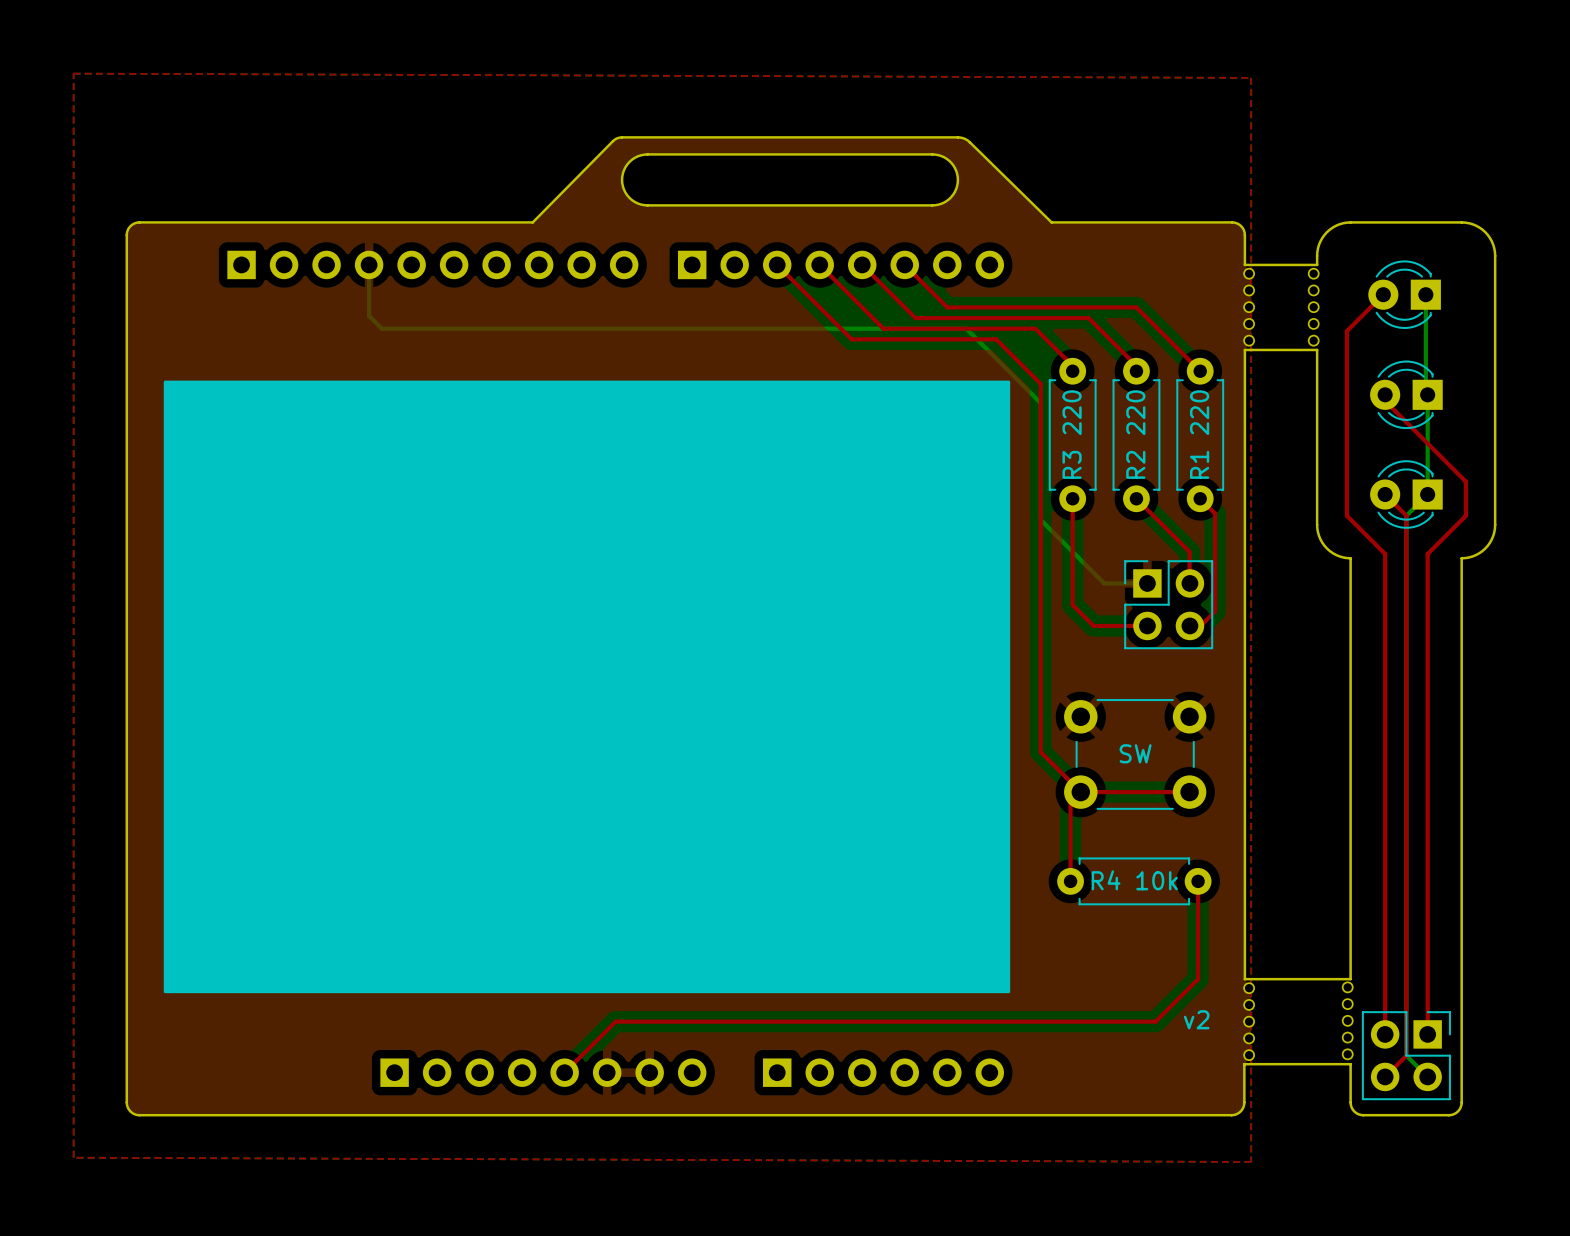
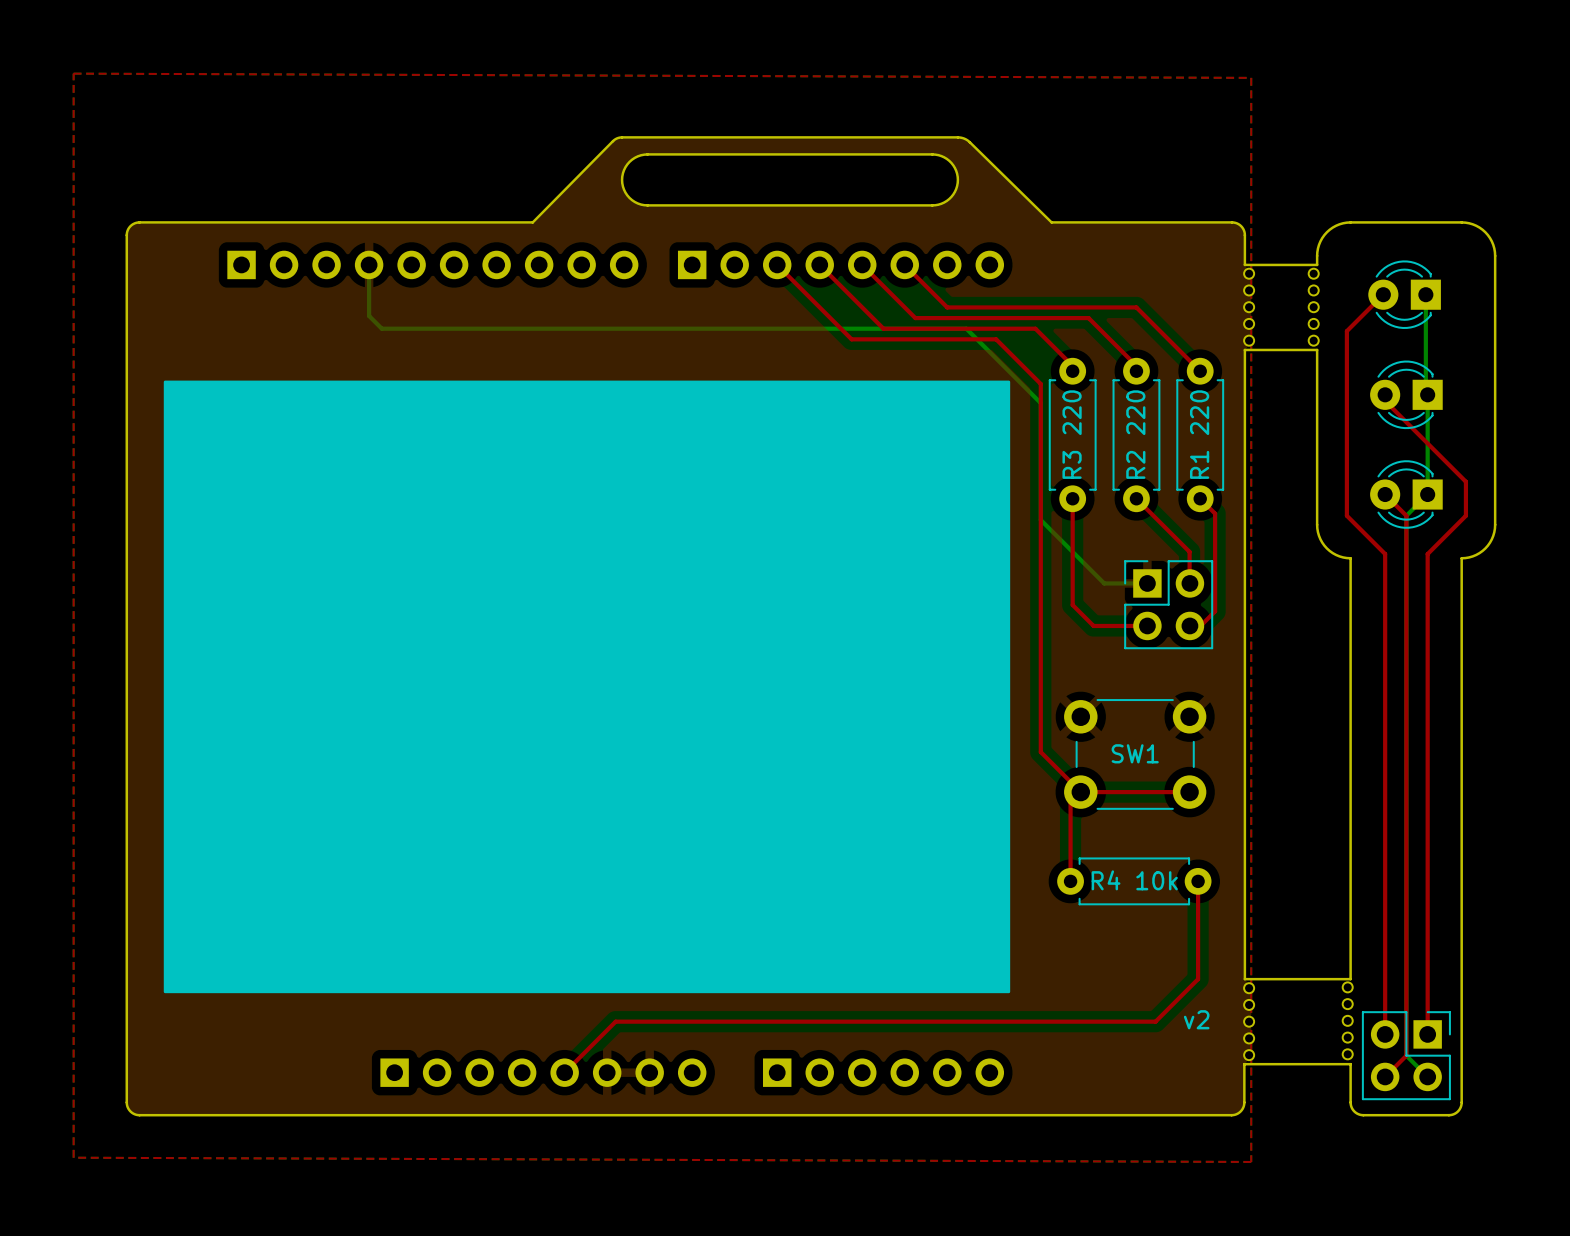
SW1 text: SW (1135, 753) -> none
SW1 name: none -> SW1 (1135, 753)

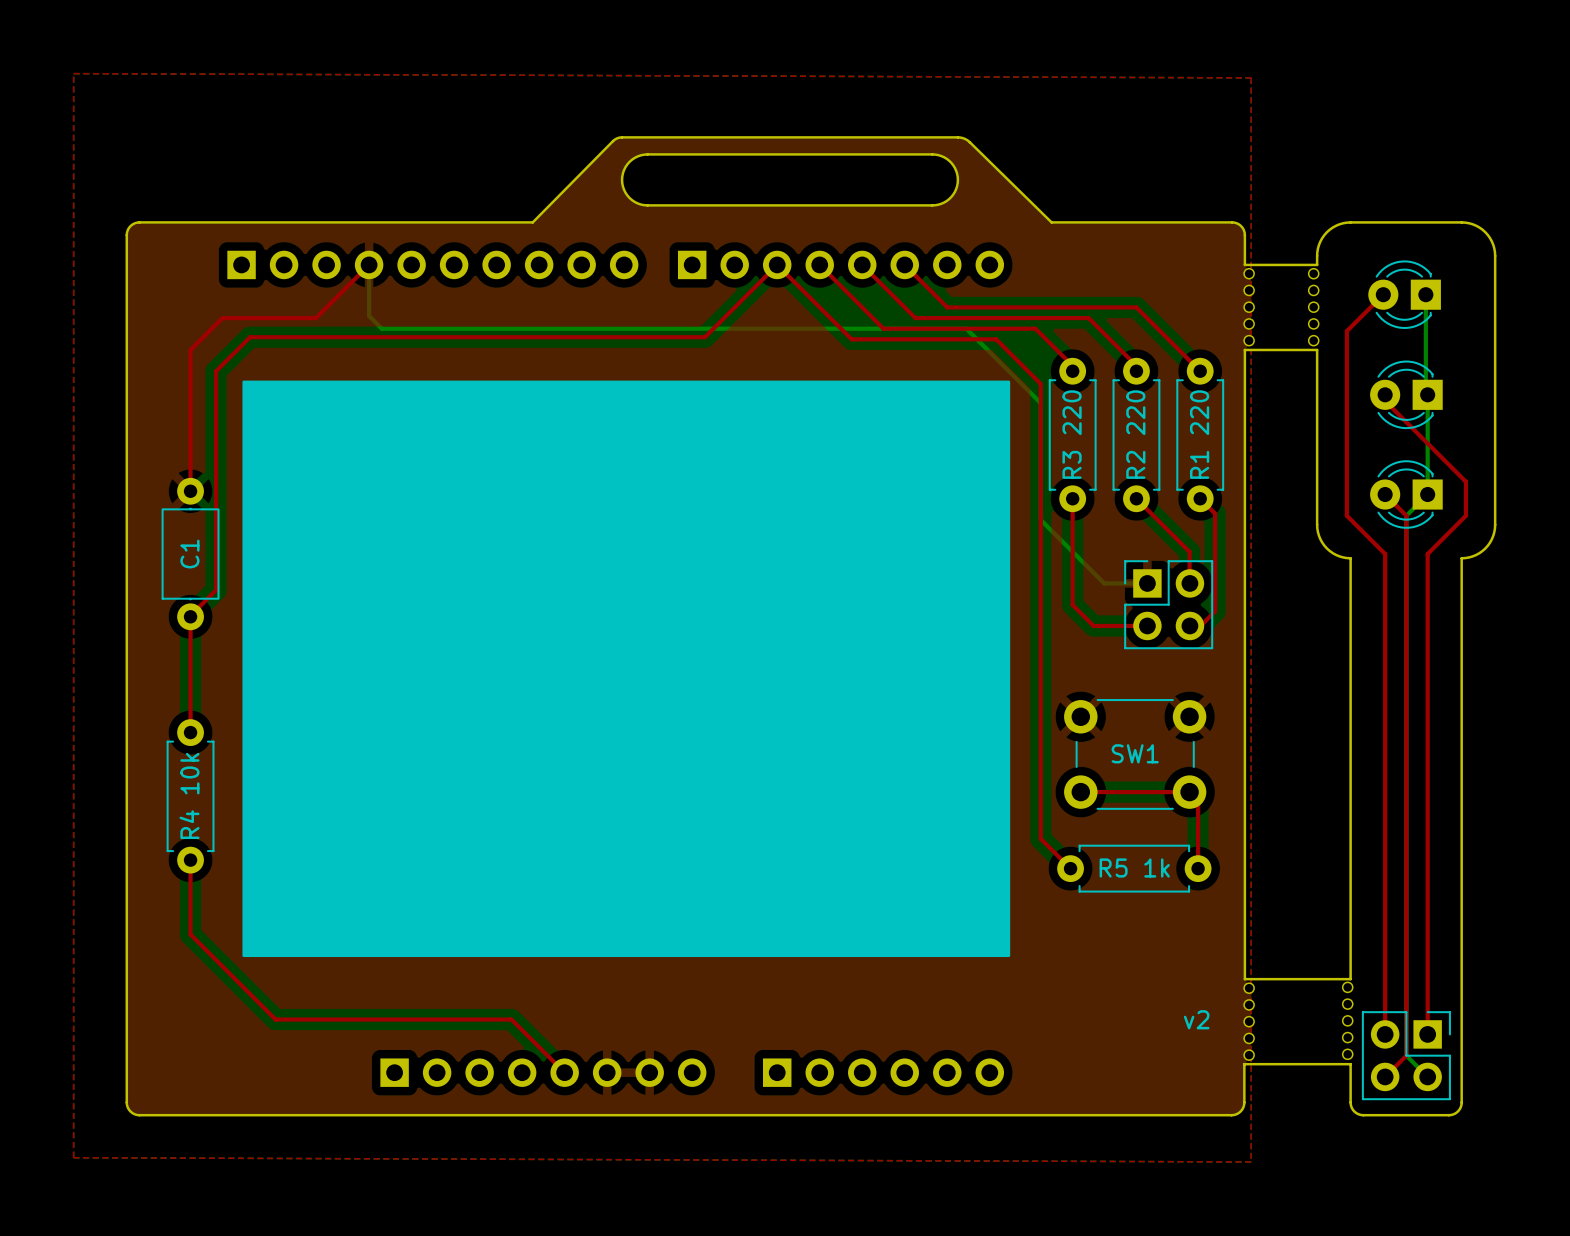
top track: none -> (369, 264) (315, 318) (222, 318) (190, 349) (190, 490)
top track: none -> (777, 264) (704, 337) (250, 337) (216, 371) (216, 590) (190, 615) (190, 732)
drawing: [163, 380, 1011, 994] -> none
drawing: none -> [242, 380, 1011, 958]
part: none -> (190, 554)
top track: (1040, 752) (1080, 792) -> (1040, 752) (1040, 838) (1070, 868)
top track: none -> (1198, 800) (1198, 868)
top track: (1070, 802) (1070, 881) -> none
part: none -> (1134, 868)
R4 10k rotation: 0° (1134, 881) -> 90° clockwise (190, 796)
R4 10k position: (1134, 881) -> (190, 796)
top track: (1198, 881) (1198, 979) (1155, 1021) (615, 1021) (564, 1072) -> (190, 860) (190, 934) (275, 1019) (511, 1019) (564, 1072)

